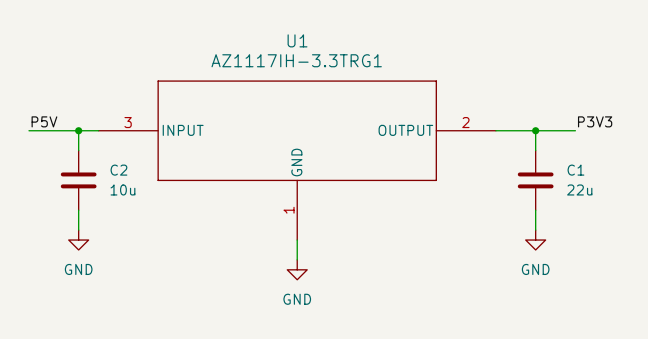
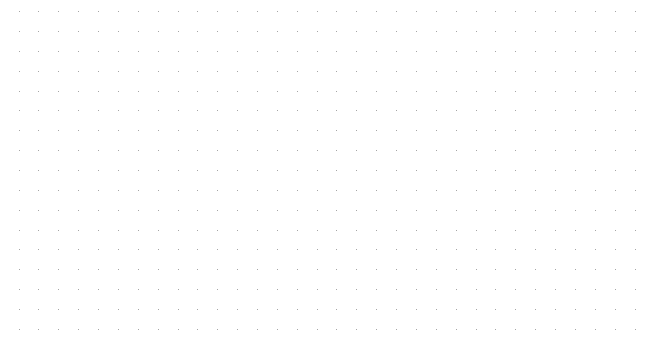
label: P5V (44, 121) -> none
label: P3V3 (595, 121) -> none
wire: (28, 130) (98, 130) -> none
wire: (78, 130) (78, 150) -> none
junction: (78, 130) -> none
wire: (495, 130) (575, 130) -> none
wire: (535, 130) (535, 150) -> none
junction: (535, 130) -> none
U1: AZ1117IH-3.3TRG1 (297, 160) -> none
C2: 10u (78, 180) -> none
C1: 22u (535, 180) -> none
wire: (78, 210) (78, 230) -> none
wire: (535, 210) (535, 230) -> none
power symbol: GND (78, 240) -> none
wire: (297, 240) (297, 259) -> none
power symbol: GND (535, 240) -> none
power symbol: GND (297, 269) -> none

